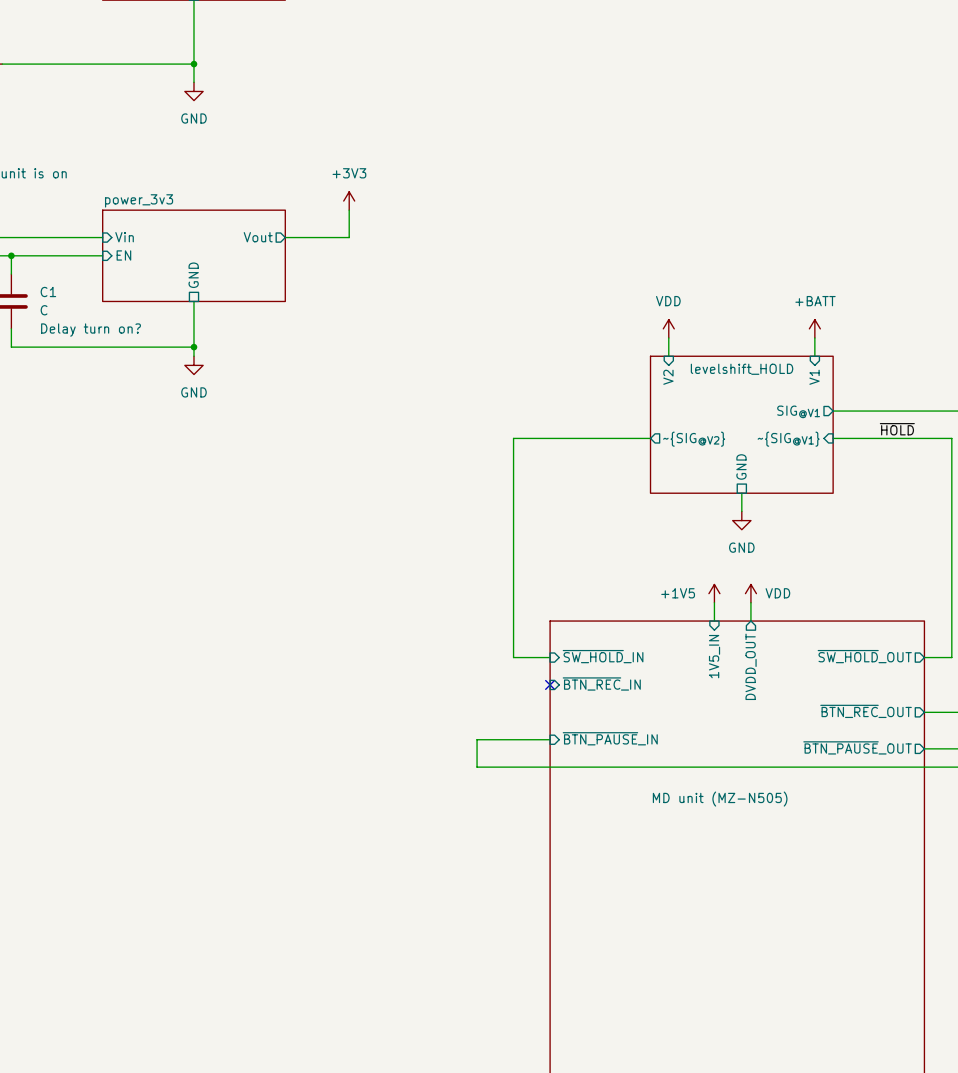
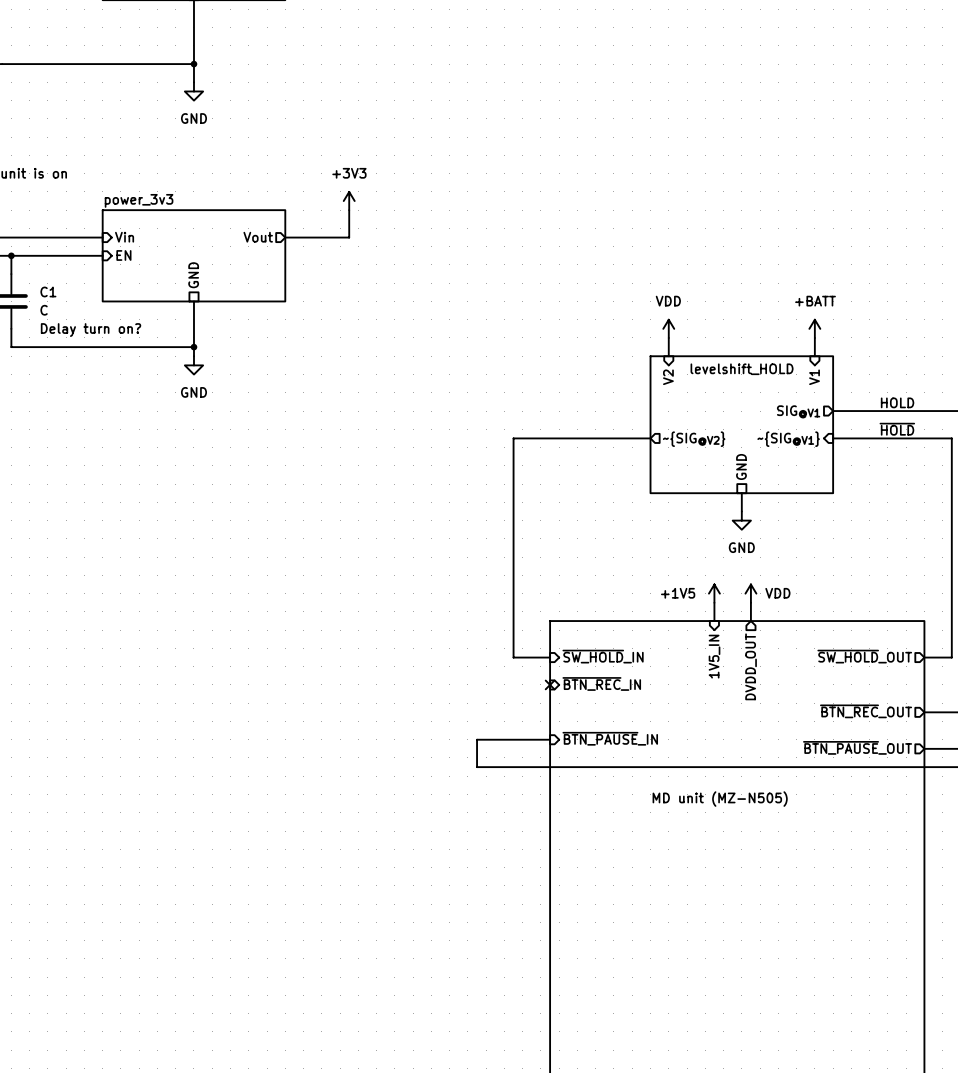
label: none -> HOLD (897, 402)

